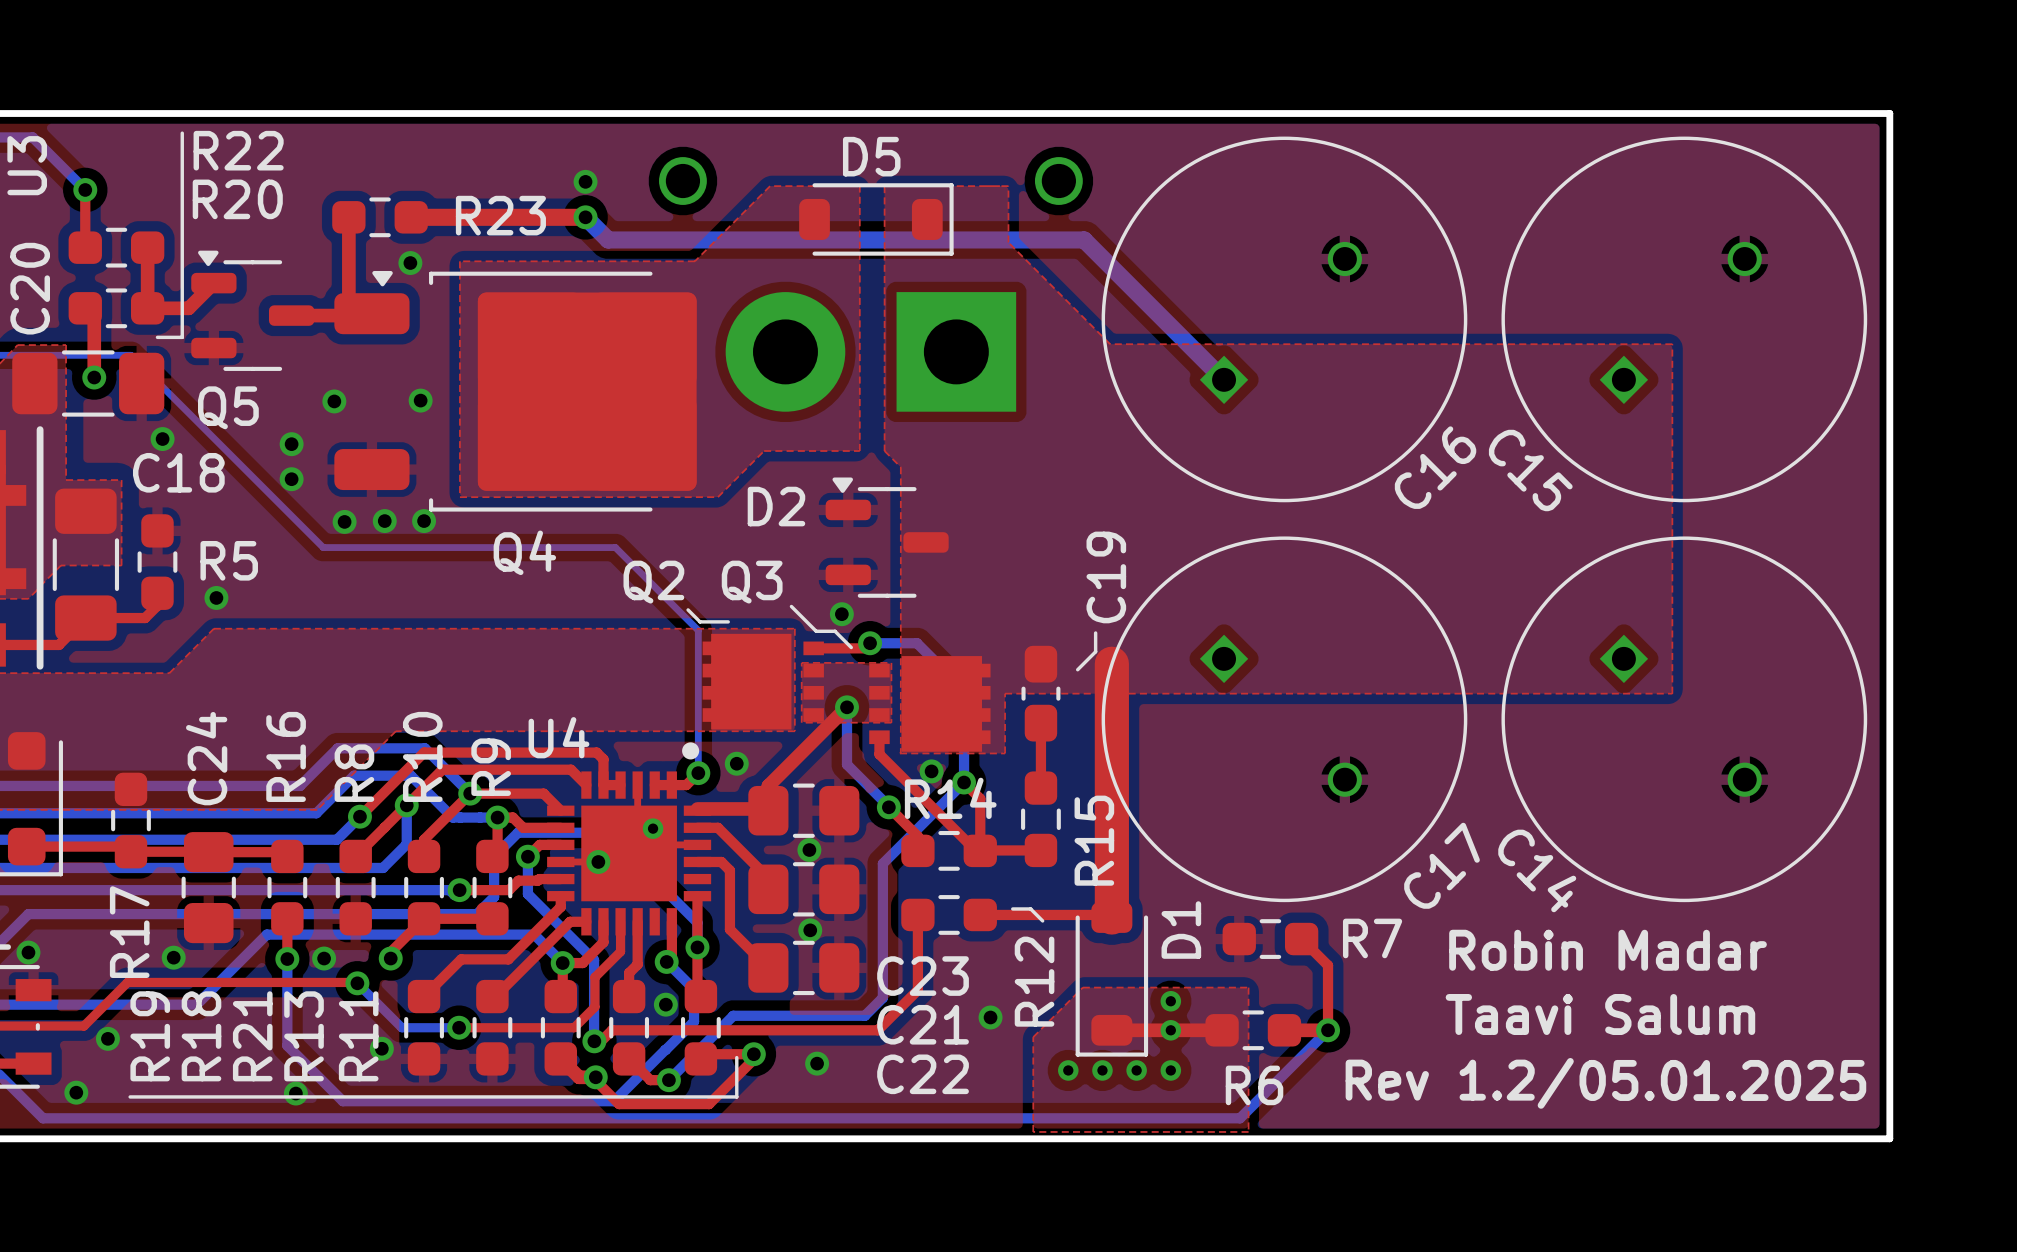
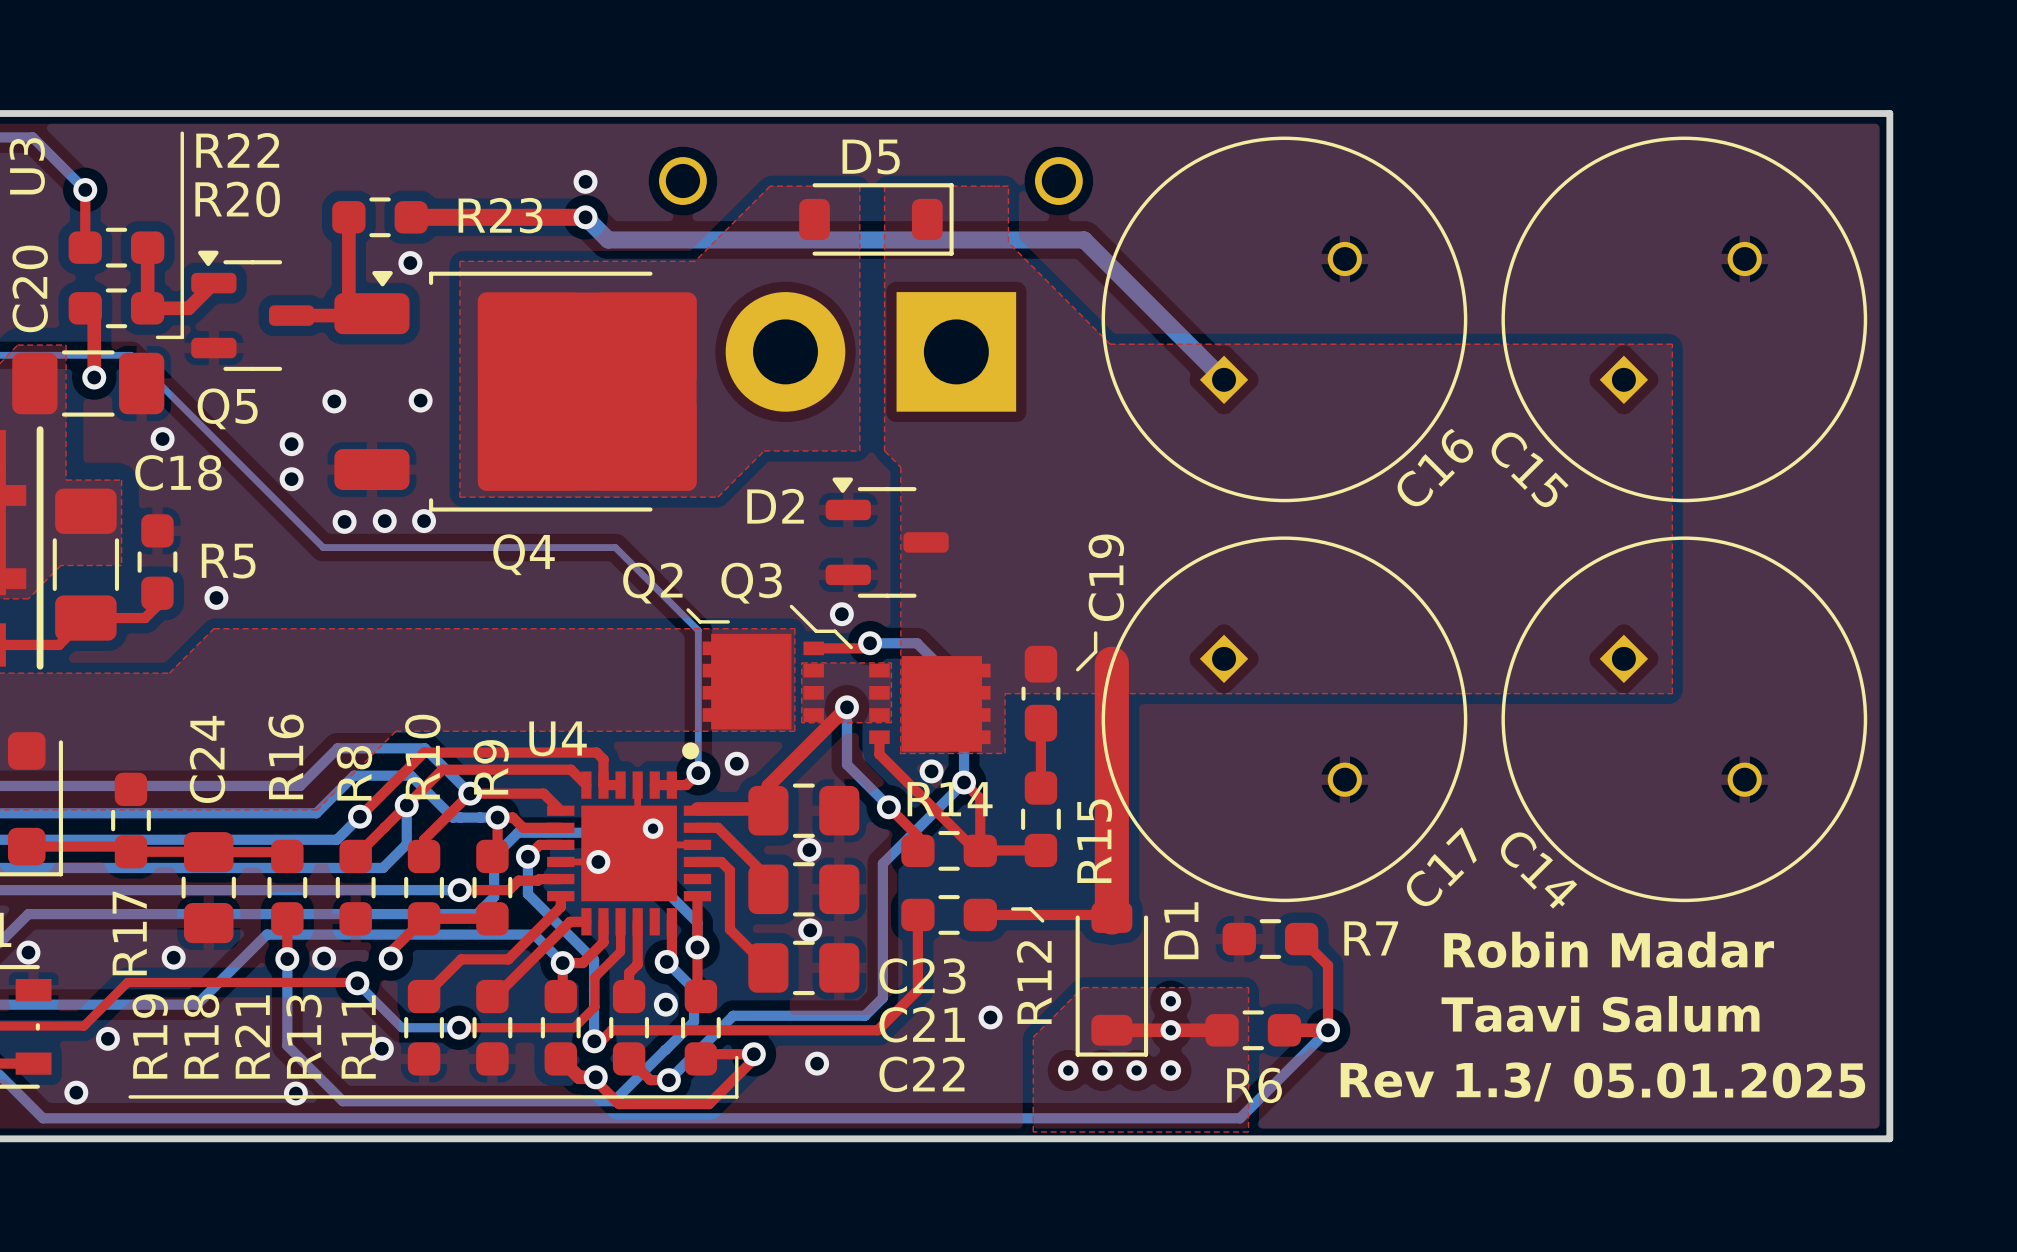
text: Rev 1.2/ (1459, 1083) -> Rev 1.3/ (1446, 1081)

